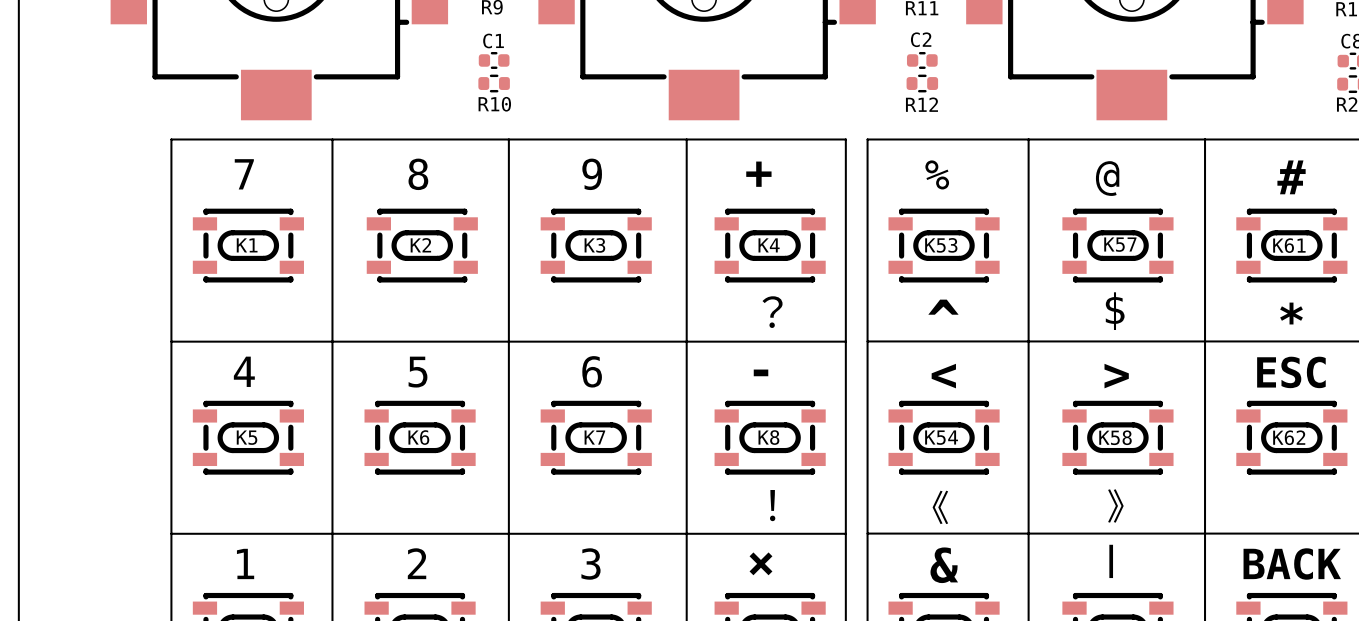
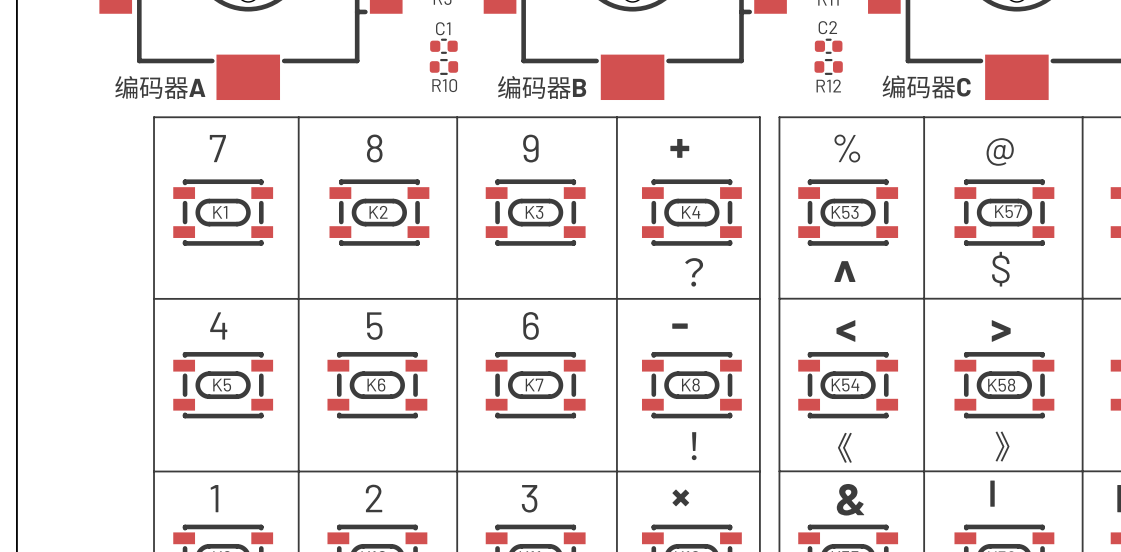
text: none -> 编码器C (926, 86)
text: none -> 编码器A (160, 87)
text: none -> 编码器B (542, 87)

